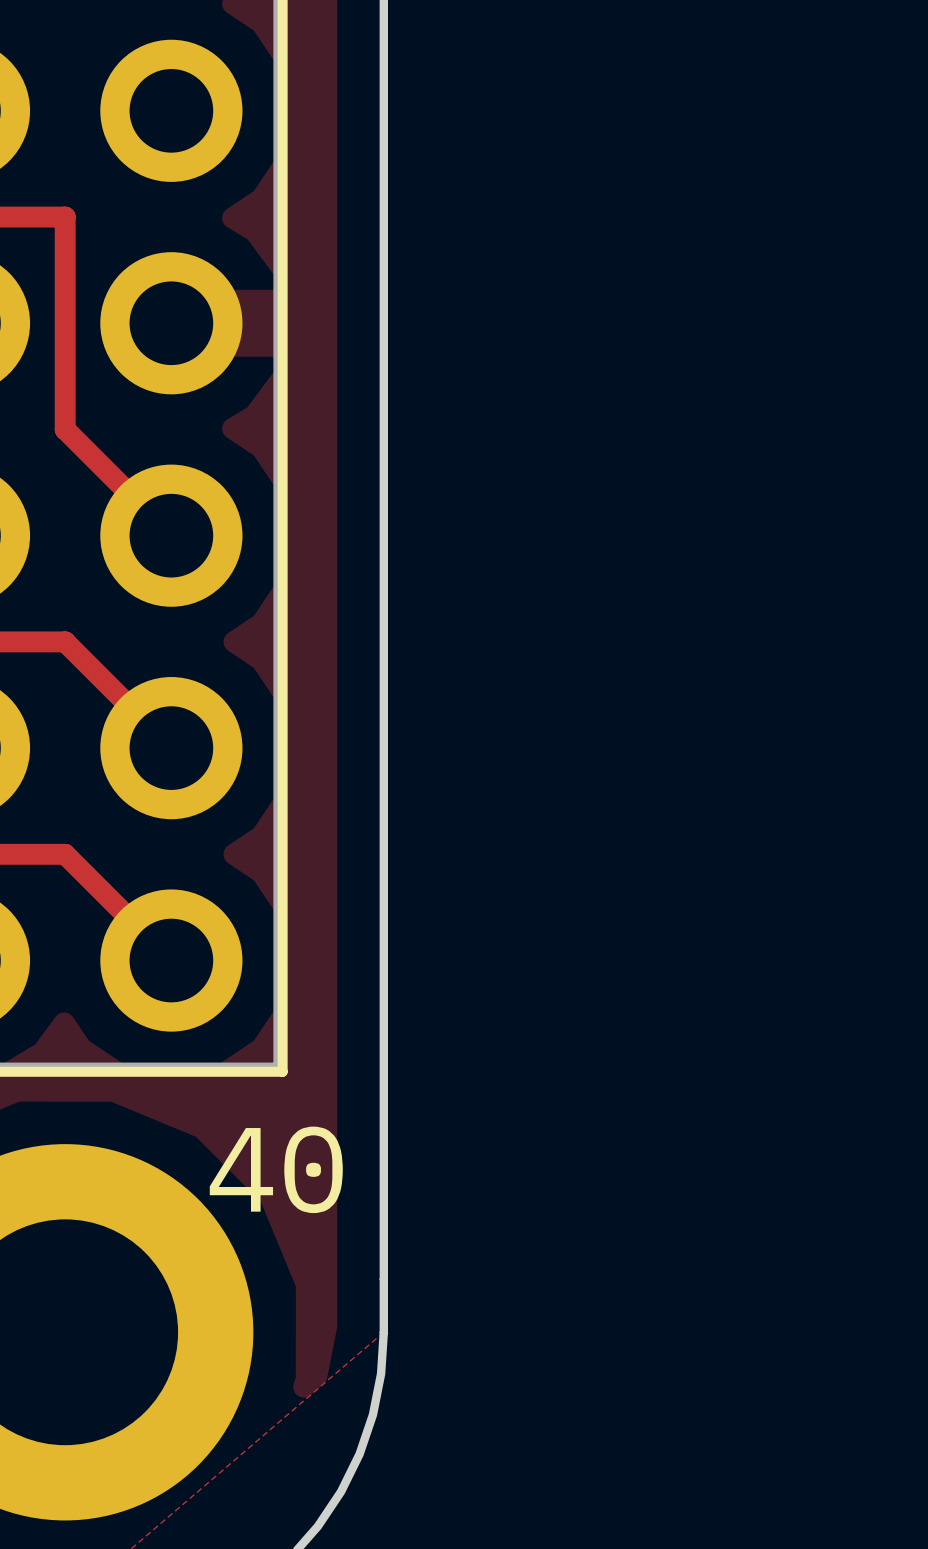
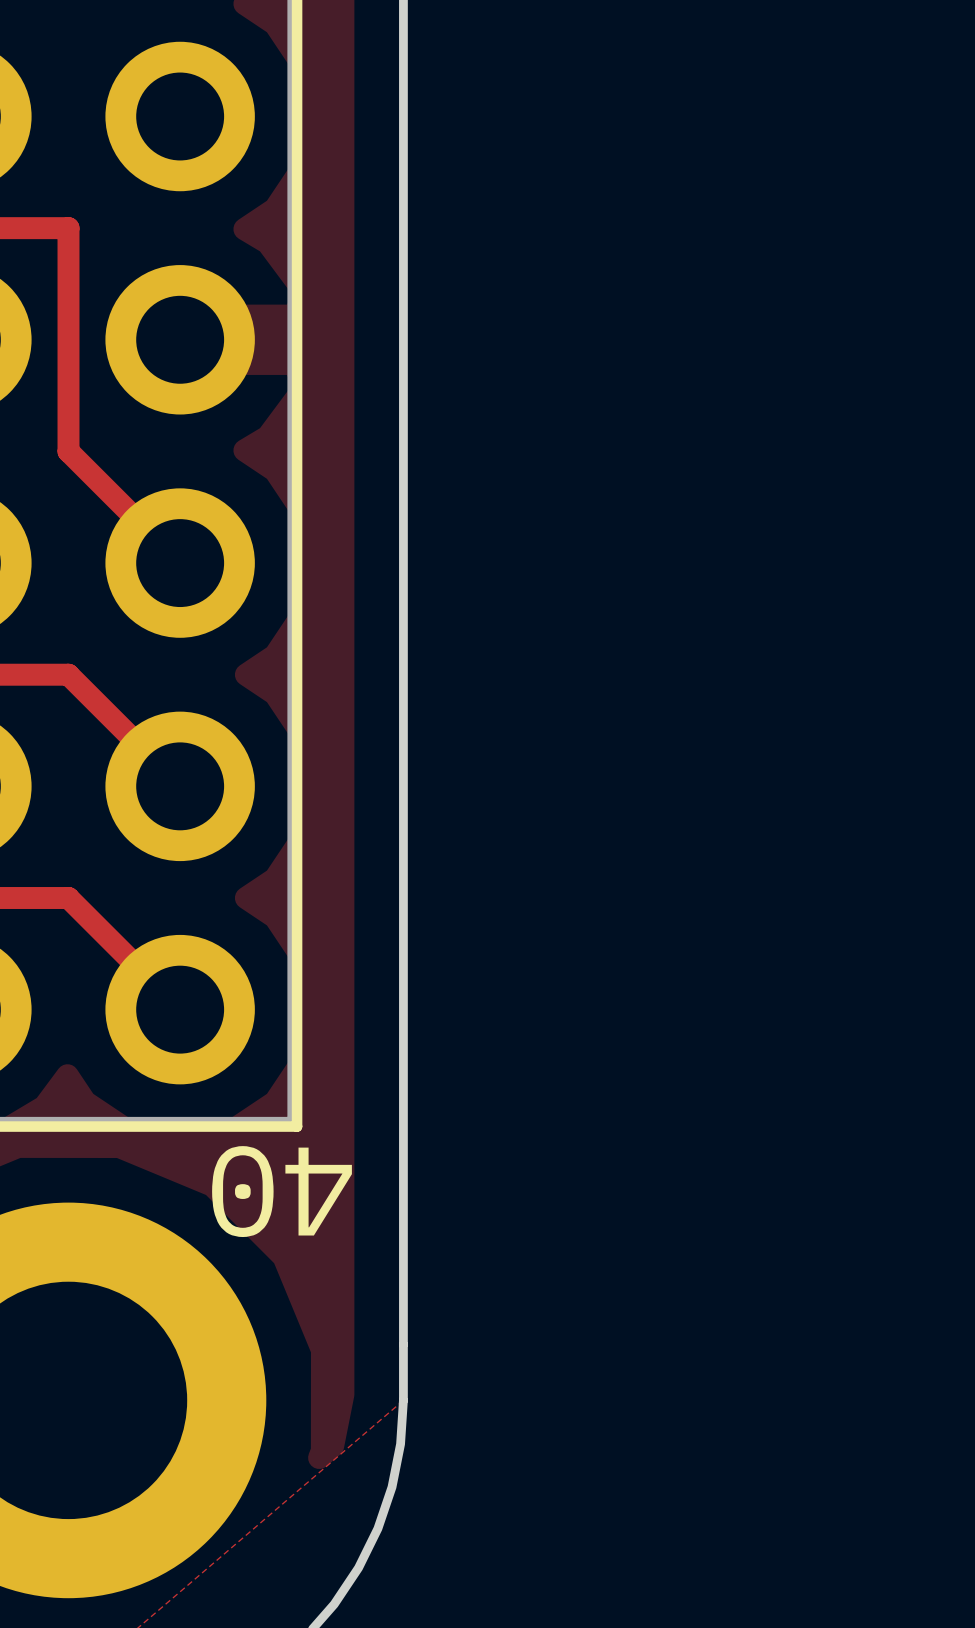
text rotation: 0° (276, 1169) -> 180° (282, 1191)

